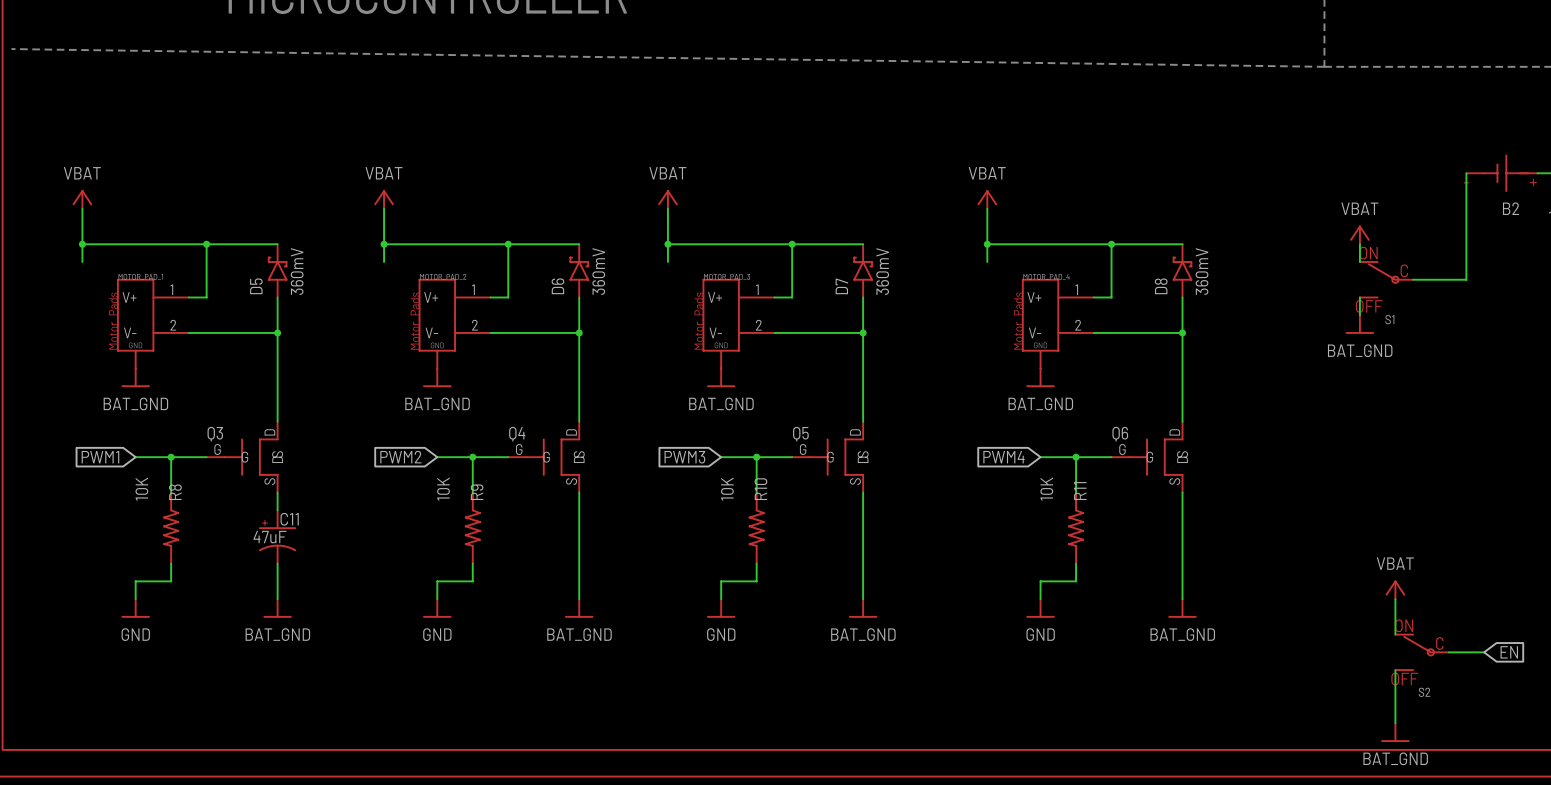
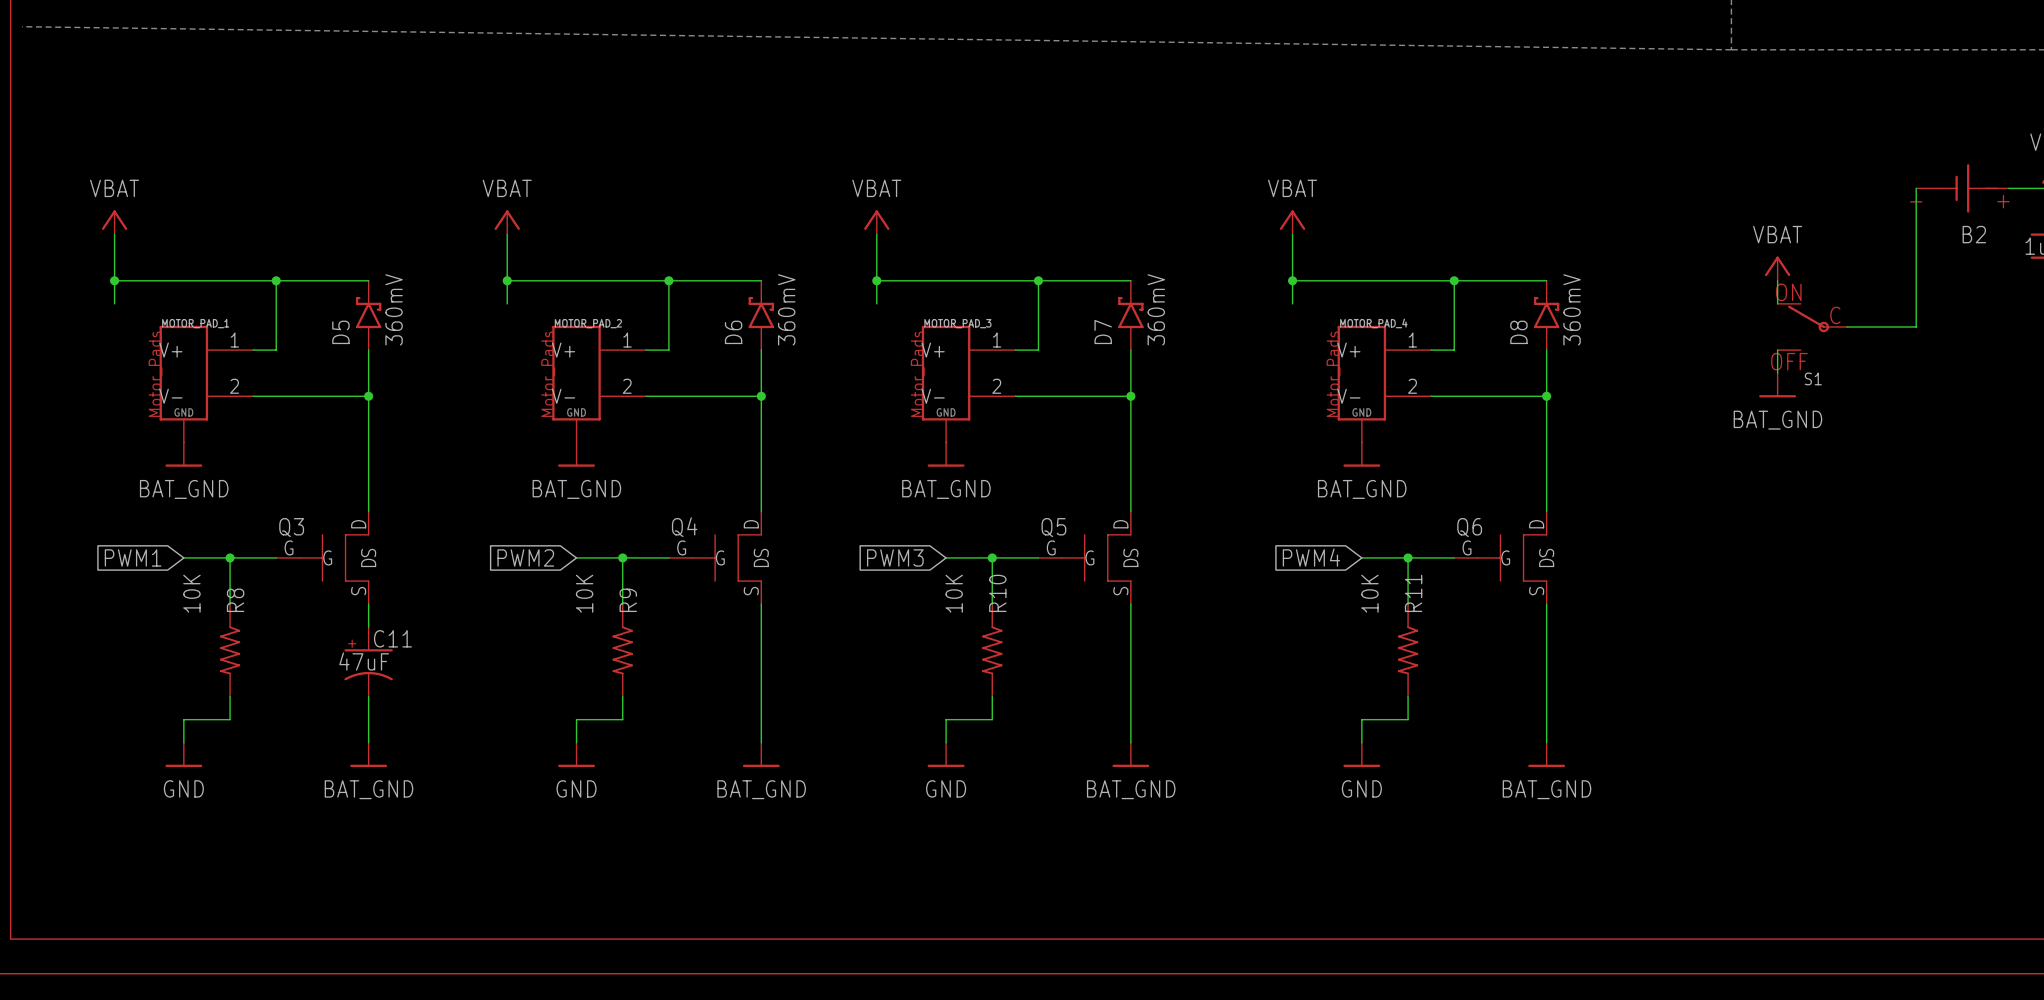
power symbol: VBAT (1395, 589) -> none
wire: (1395, 599) (1395, 634) -> none
S2: (1422, 652) -> none
wire: (1448, 652) (1484, 652) -> none
global label: EN (1509, 652) -> none
wire: (1395, 670) (1395, 723) -> none
power symbol: BAT_GND (1395, 732) -> none

